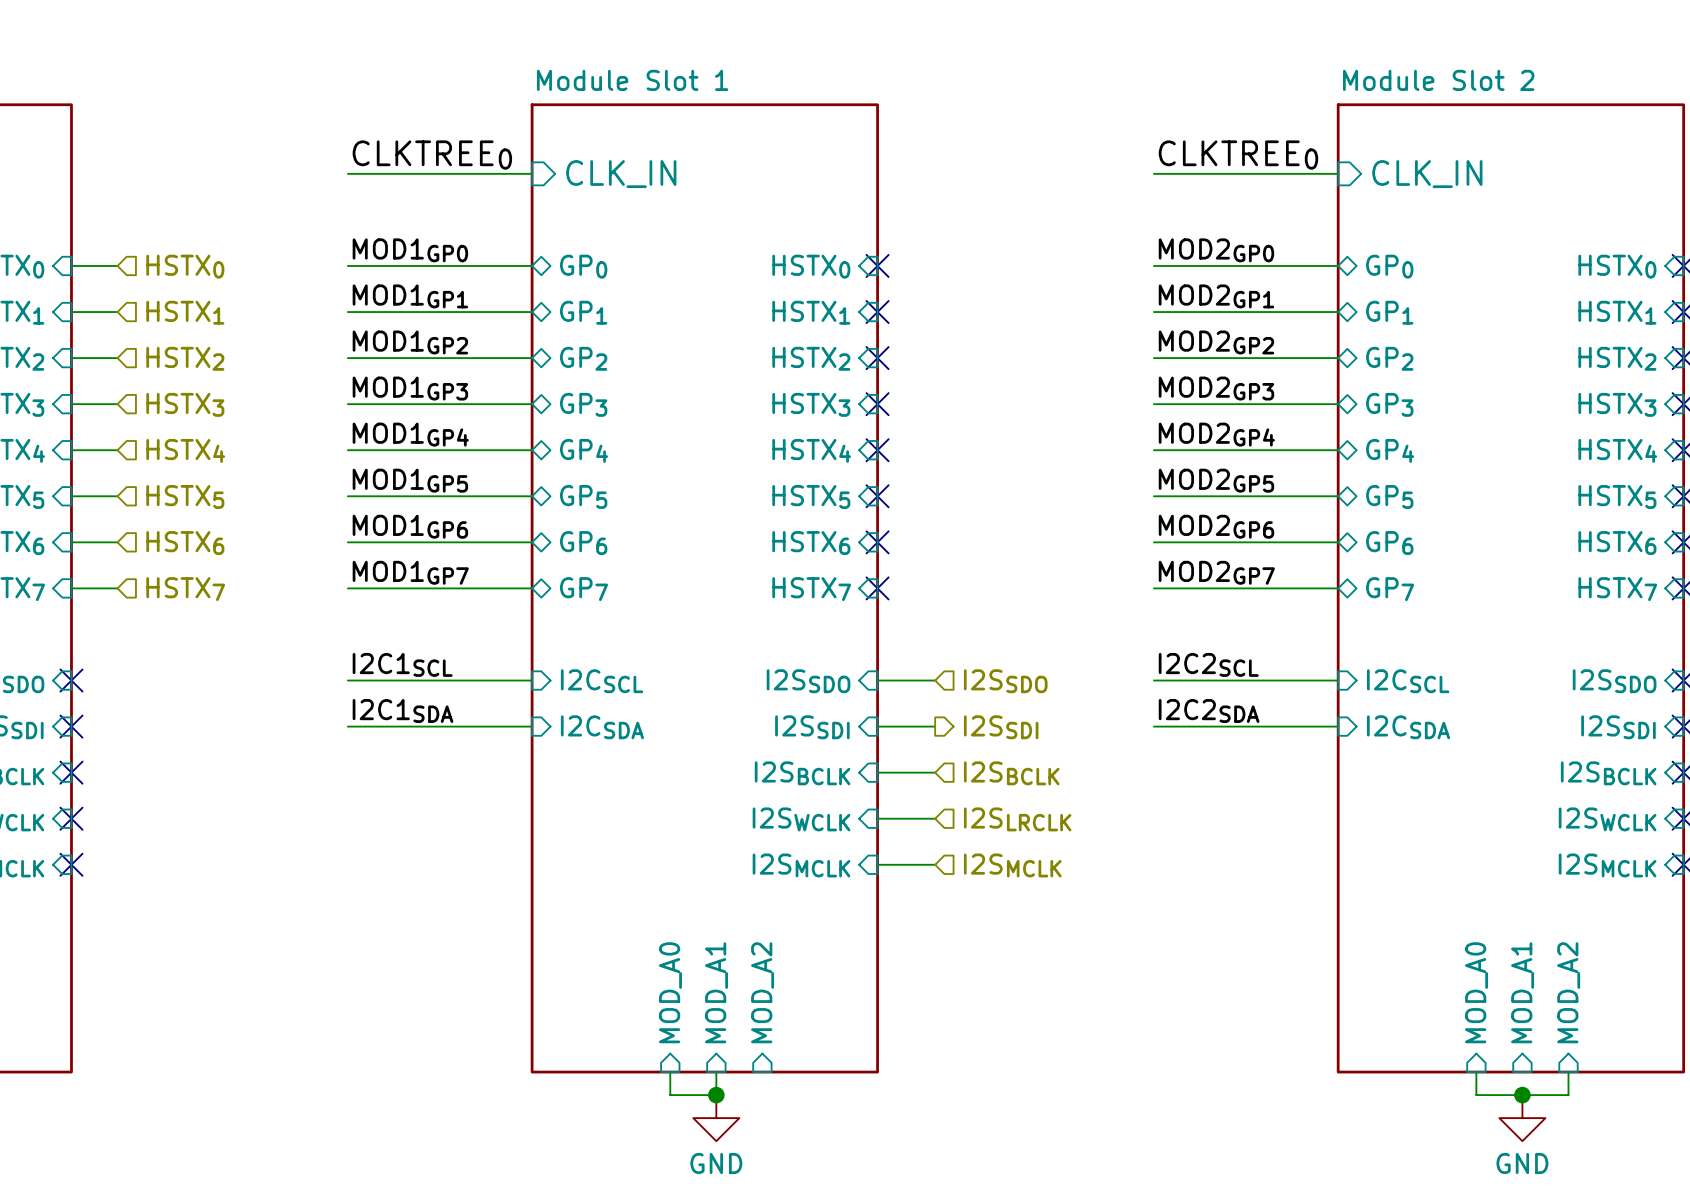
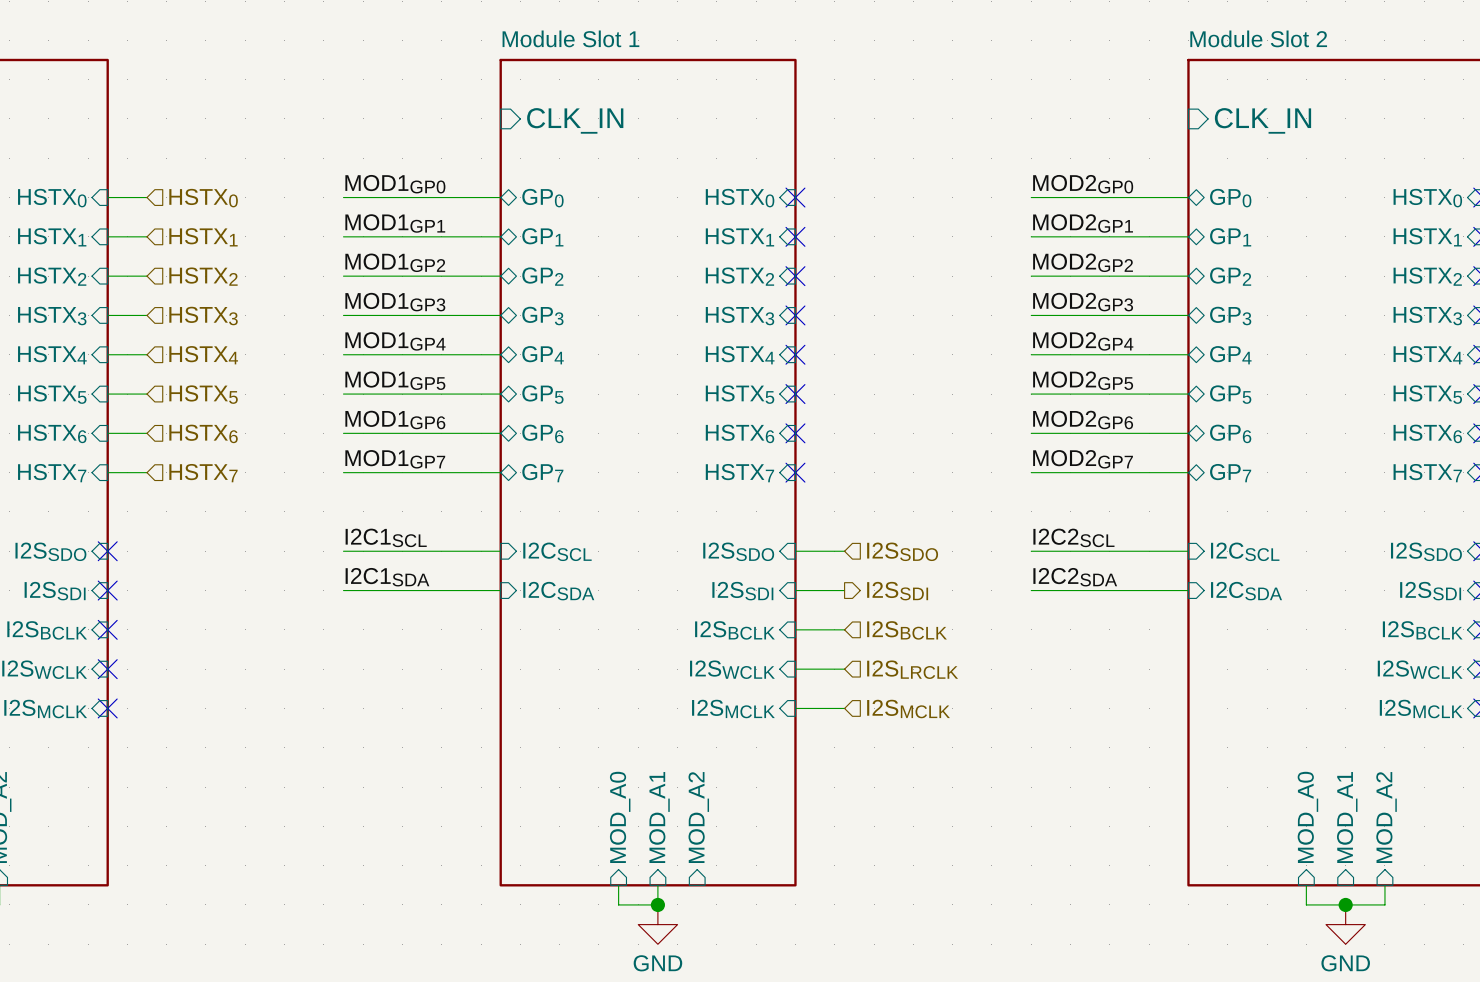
label: CLKTREE0 (432, 155) -> none
label: CLKTREE0 (1238, 155) -> none
wire: (347, 173) (532, 173) -> none
wire: (1153, 173) (1338, 173) -> none

